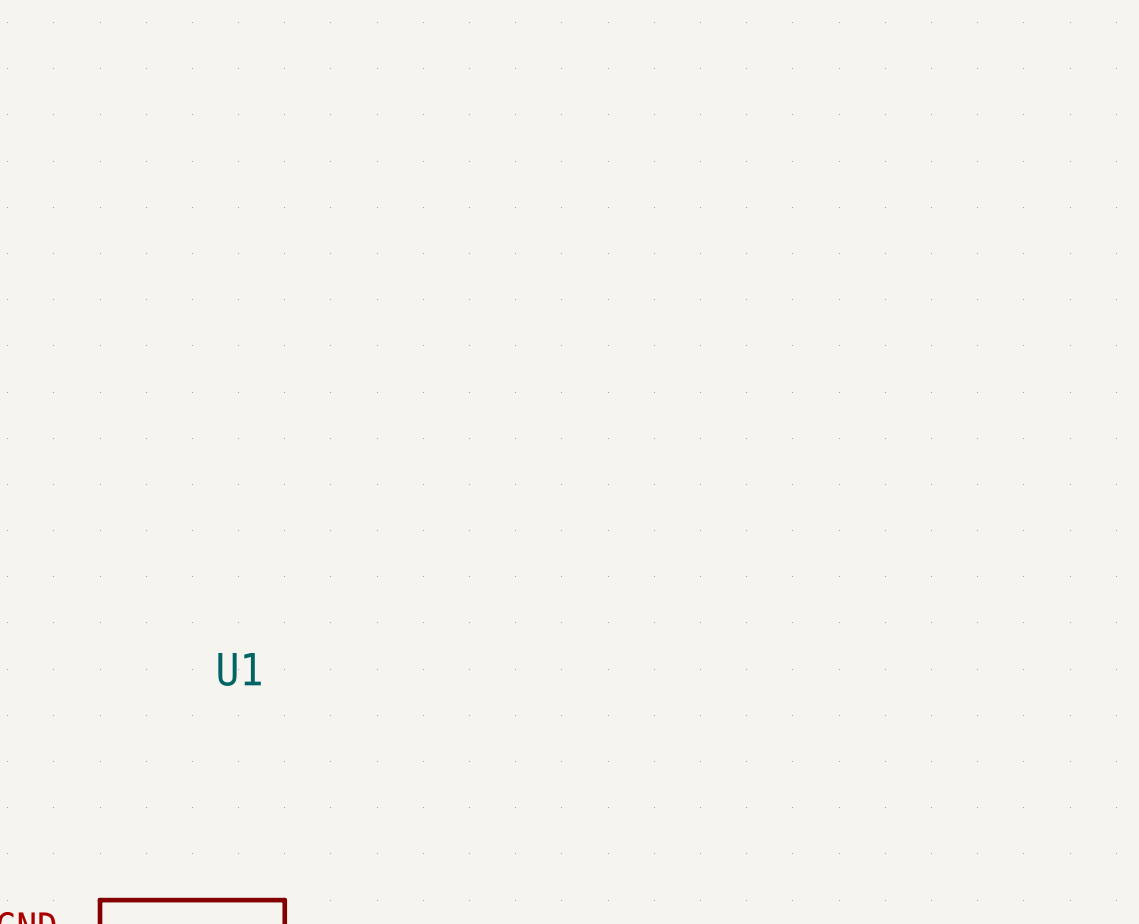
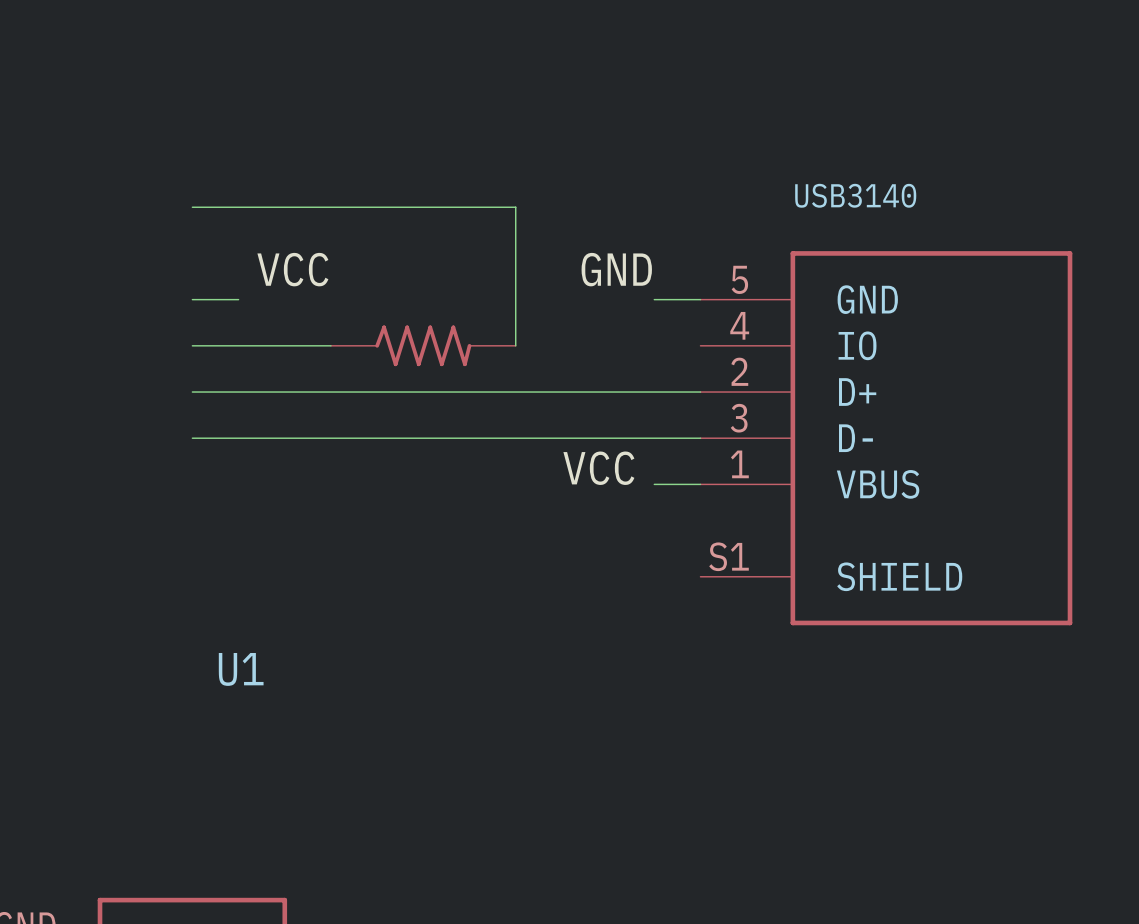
wire: none -> (192, 207) (515, 207) (515, 345)
label: none -> VCC (292, 269)
label: none -> GND (616, 269)
wire: none -> (192, 299) (238, 299)
wire: none -> (654, 299) (700, 299)
wire: none -> (192, 345) (330, 345)
part: none -> (423, 345)
wire: none -> (192, 392) (700, 392)
wire: none -> (192, 438) (700, 438)
part: none -> USB3140 (886, 438)
label: none -> VCC (598, 468)
wire: none -> (654, 484) (700, 484)

